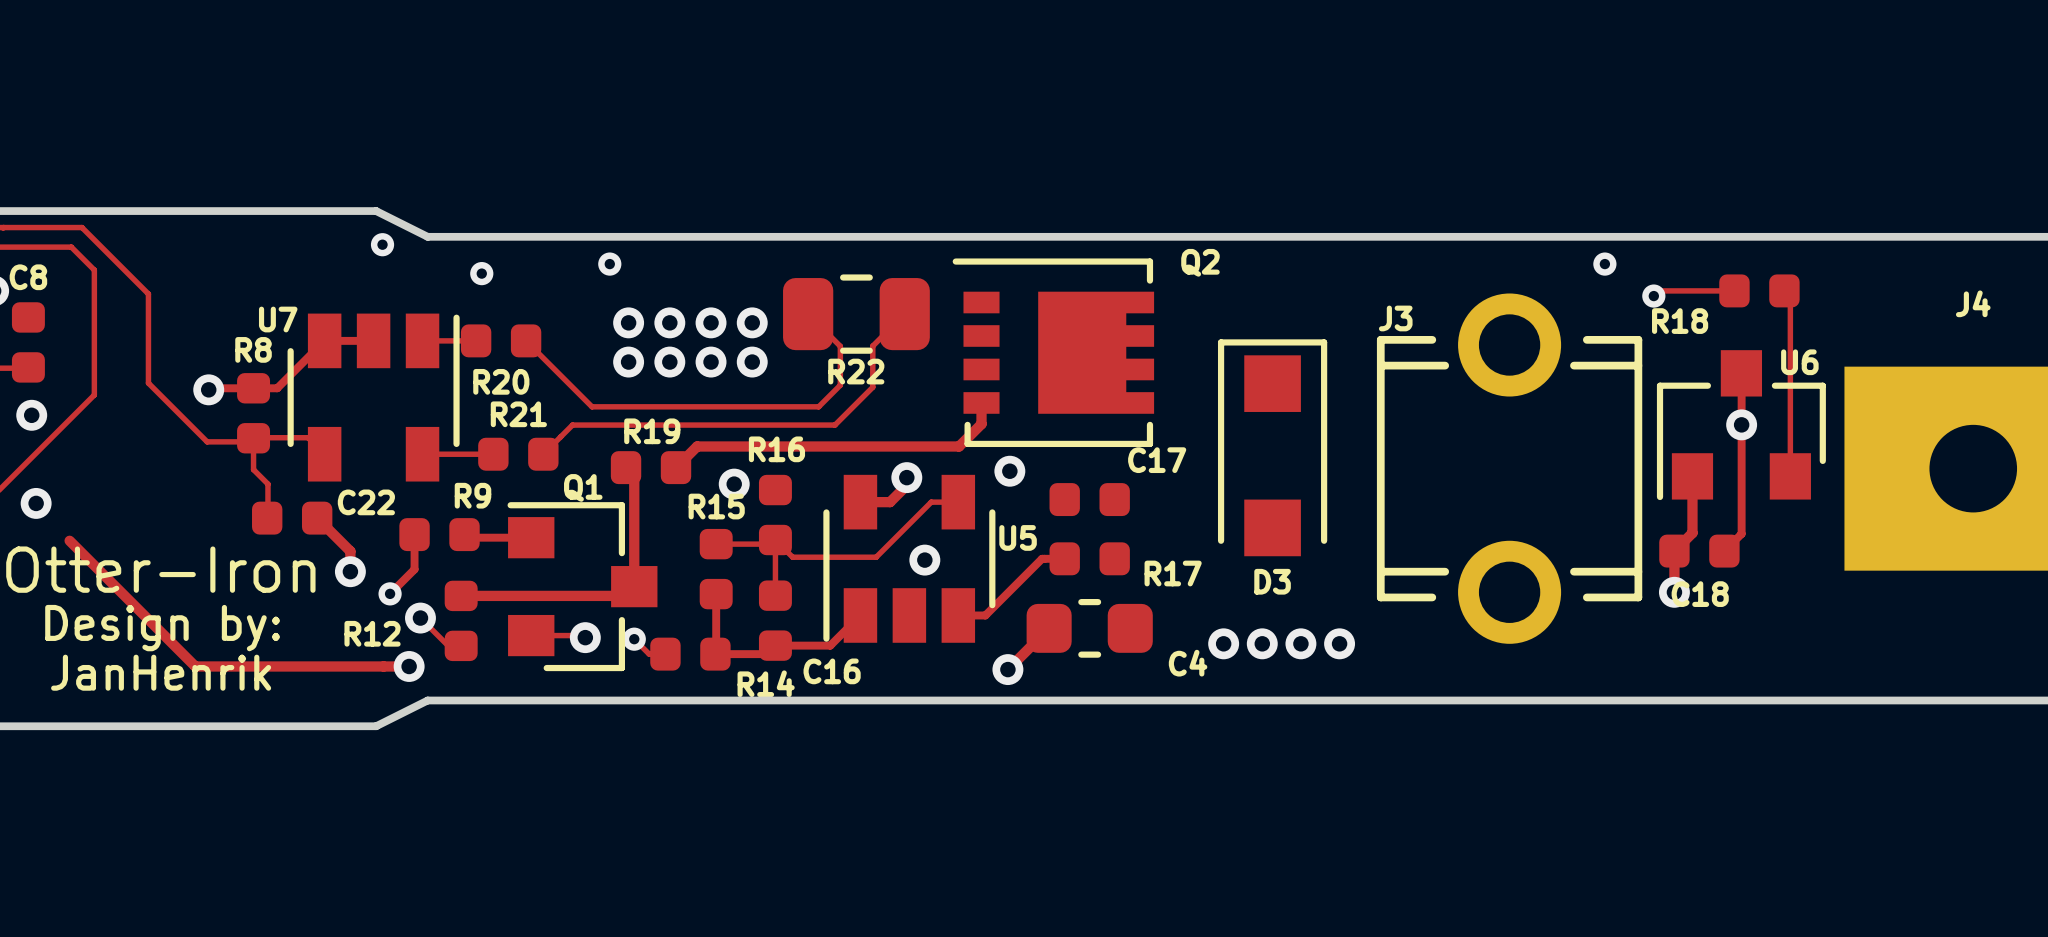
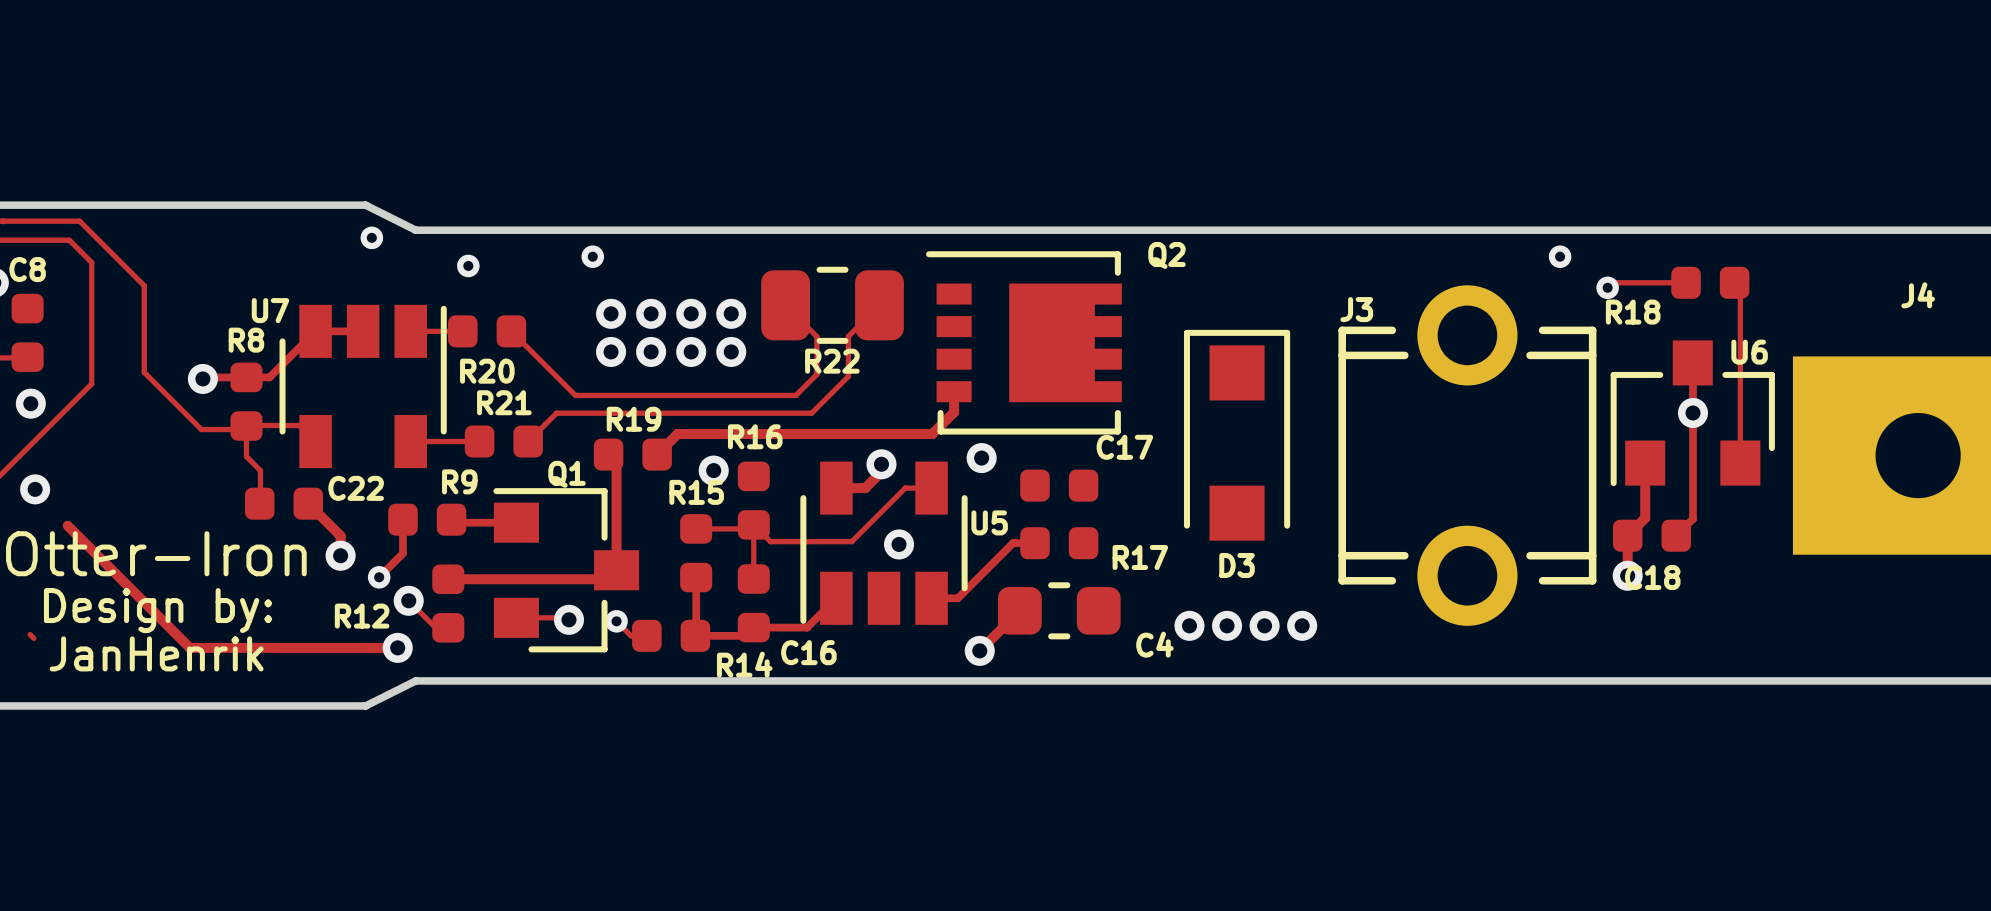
track: none -> (30, 634) (33, 638)

